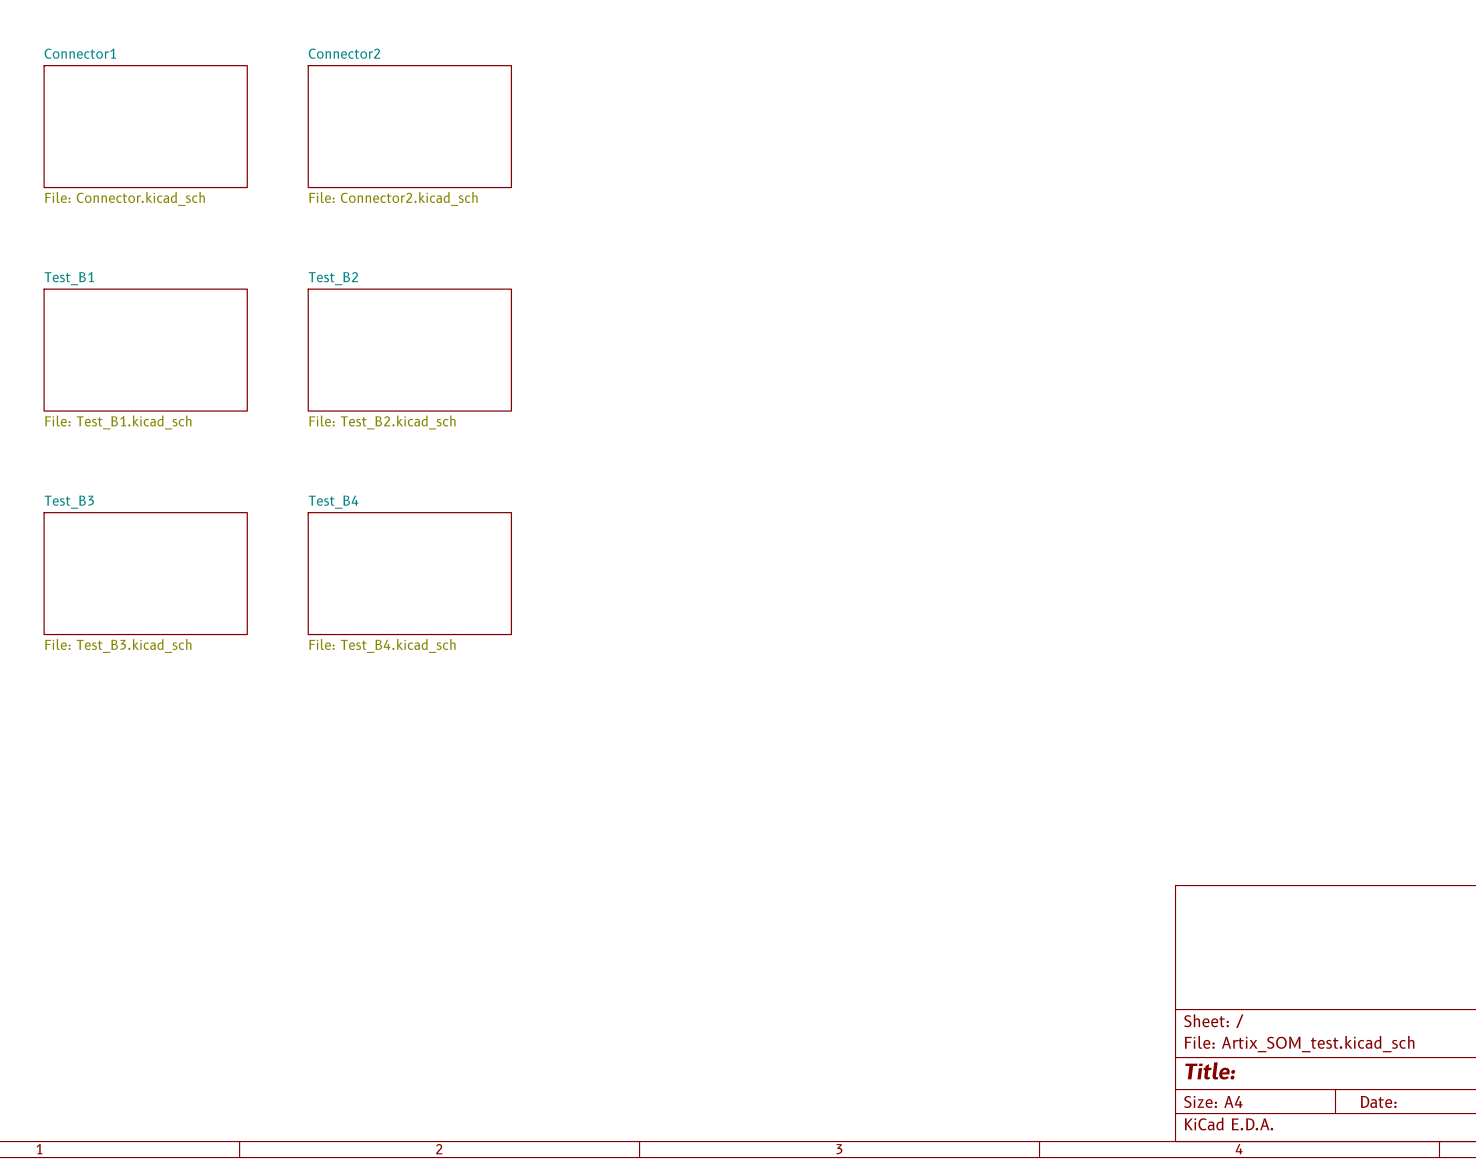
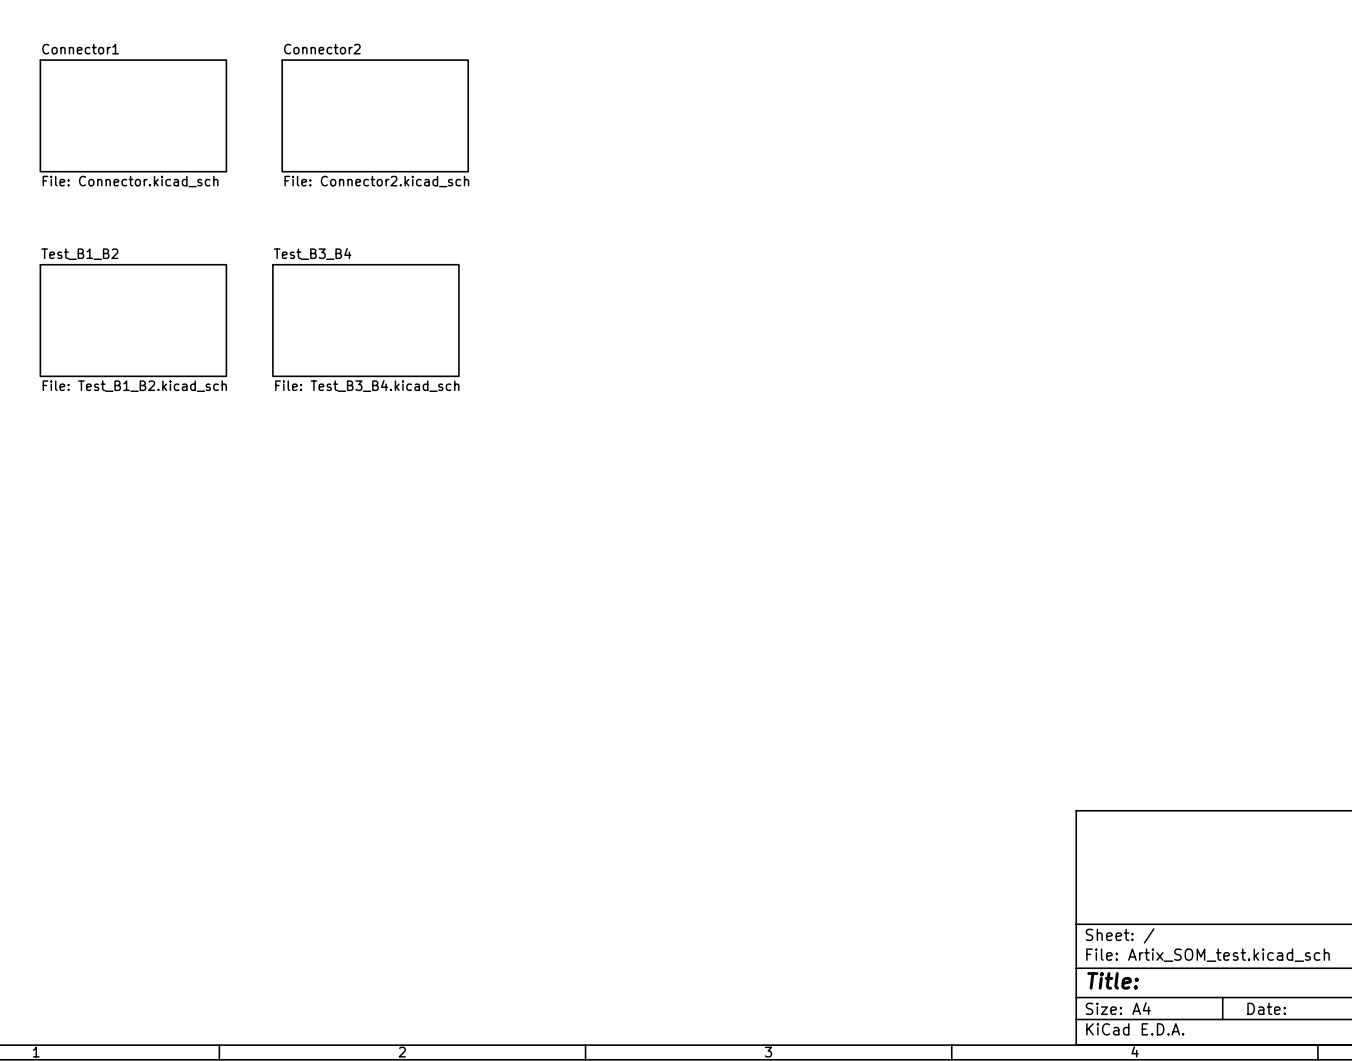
sheet Test_B1 name: Test_B1 (69, 278) -> Test_B1_B2 (79, 254)
sheet Test_B3_B4: none -> File: Test_B3_B4.kicad_sch (365, 320)
sheet Test_B2: File: Test_B2.kicad_sch (409, 350) -> none
sheet Test_B1 value: File: Test_B1.kicad_sch (118, 422) -> File: Test_B1_B2.kicad_sch (134, 386)
sheet Test_B3: File: Test_B3.kicad_sch (145, 573) -> none
sheet Test_B4: File: Test_B4.kicad_sch (409, 573) -> none

